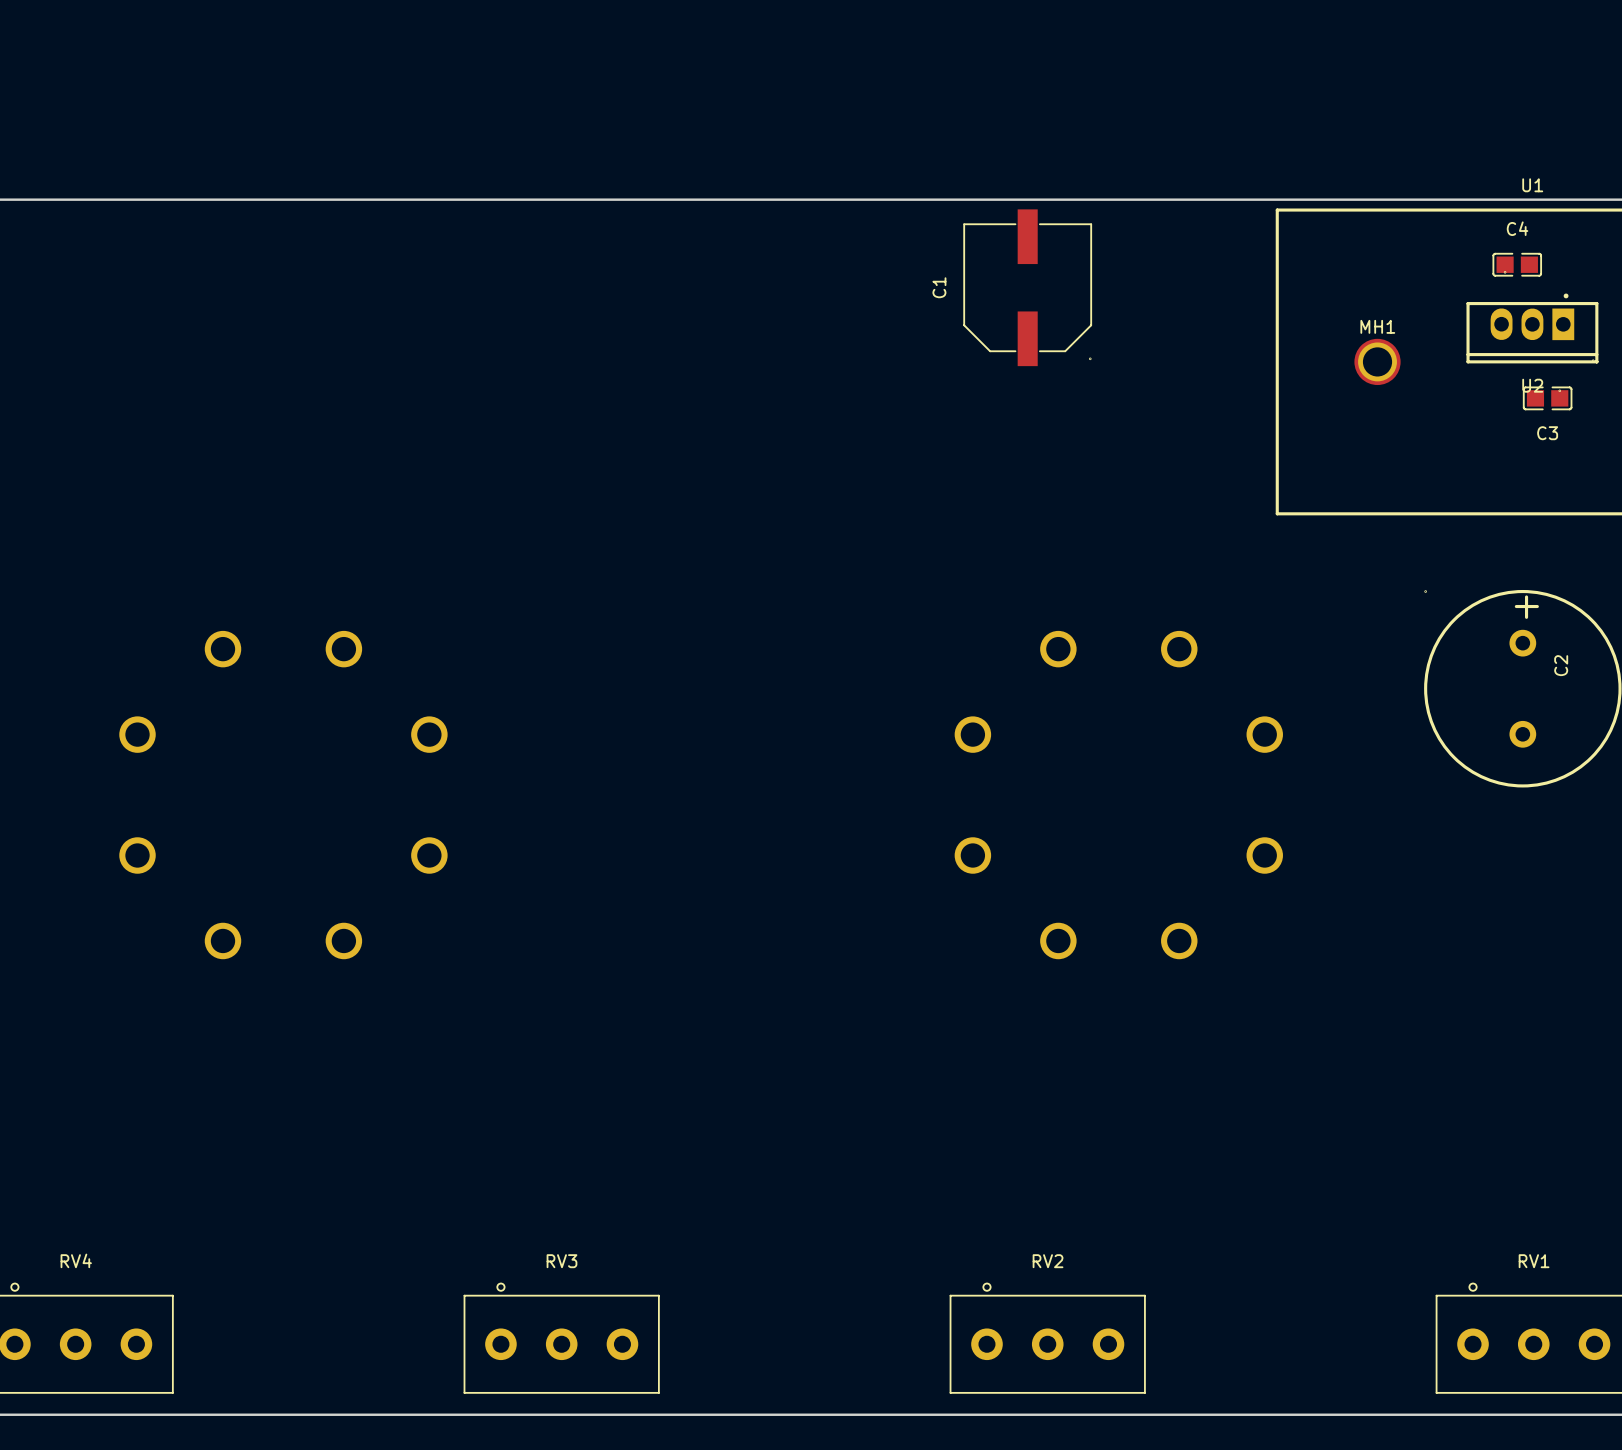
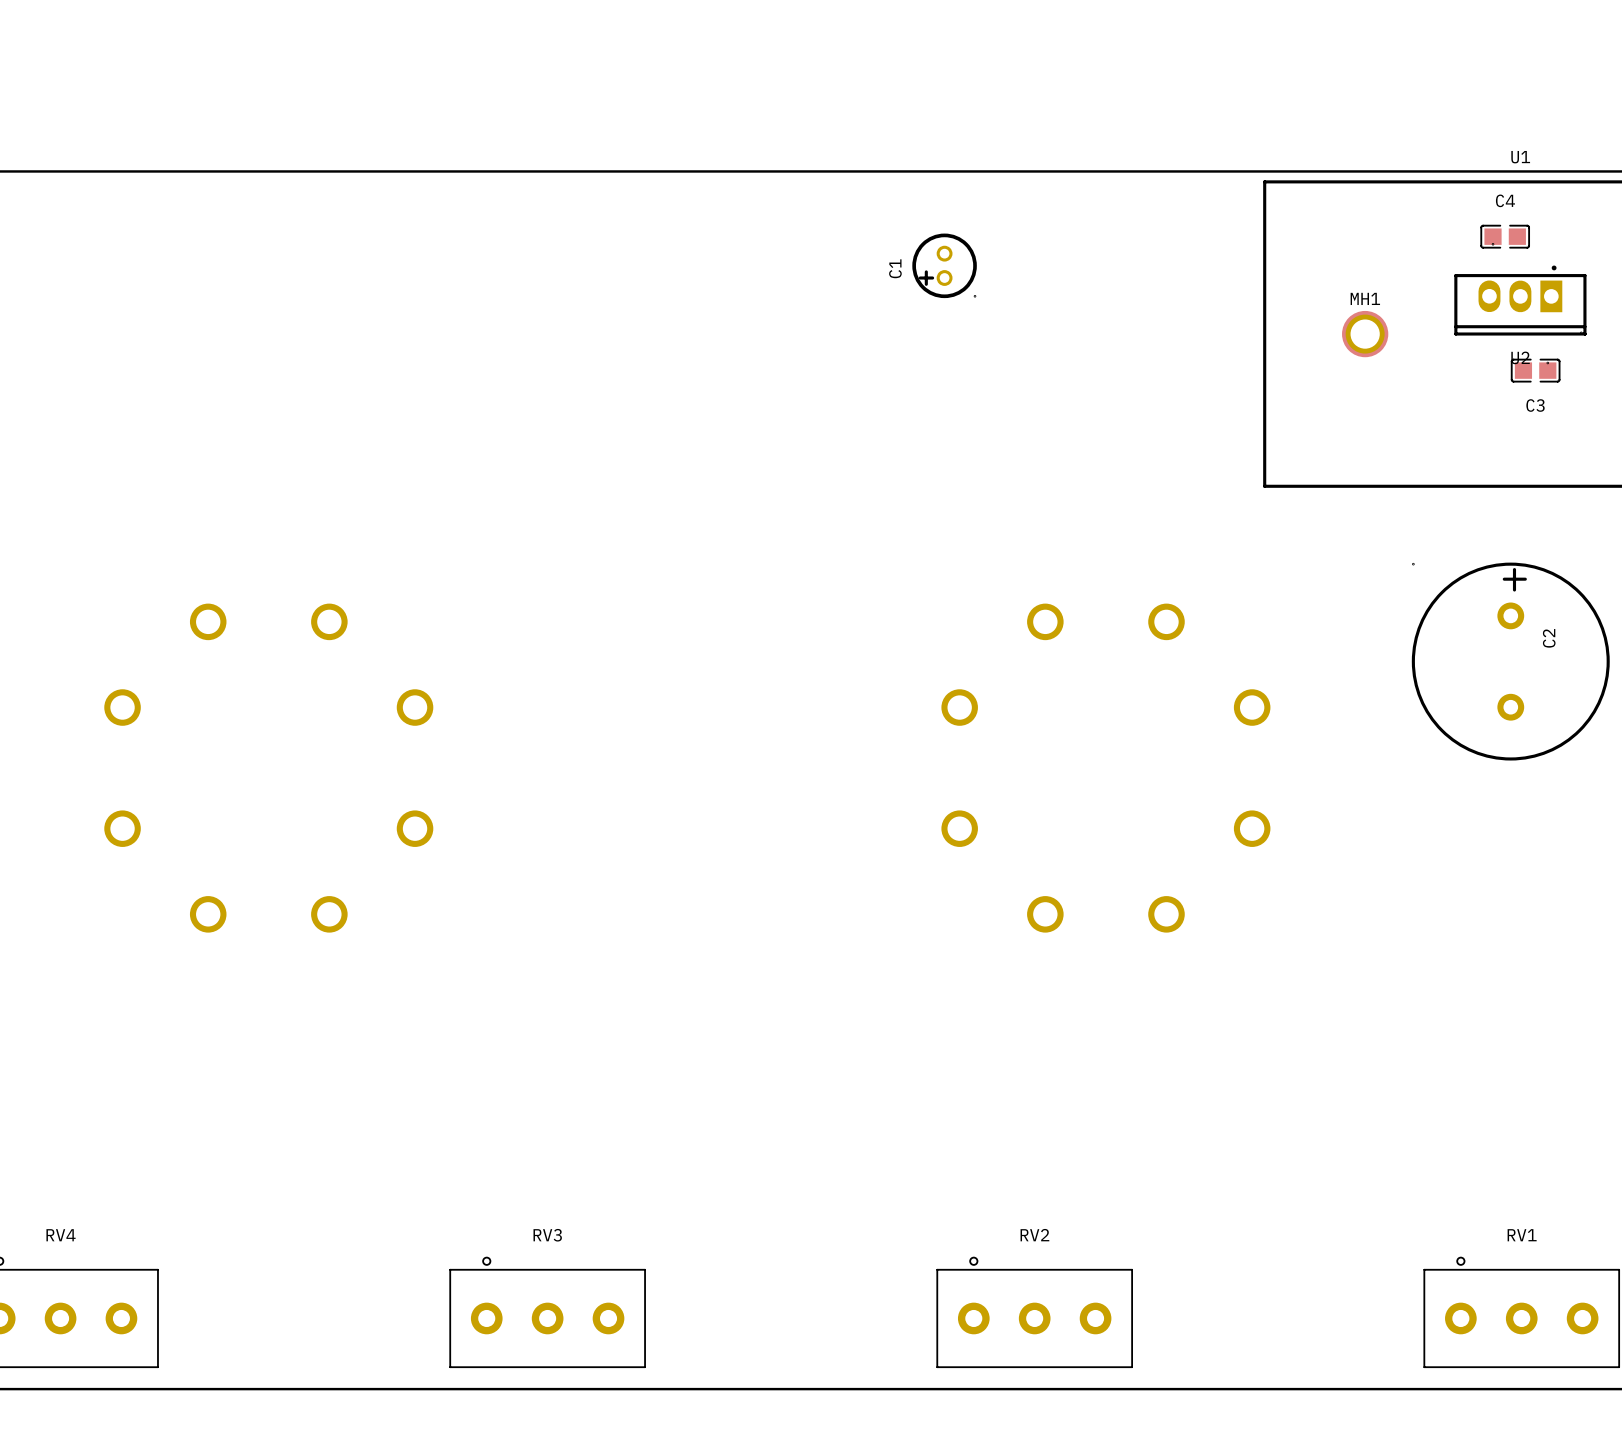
C1 footprint: [963, 209, 1093, 367] -> [912, 233, 977, 299]
C1 name position: C1 (939, 287) -> C1 (895, 268)

